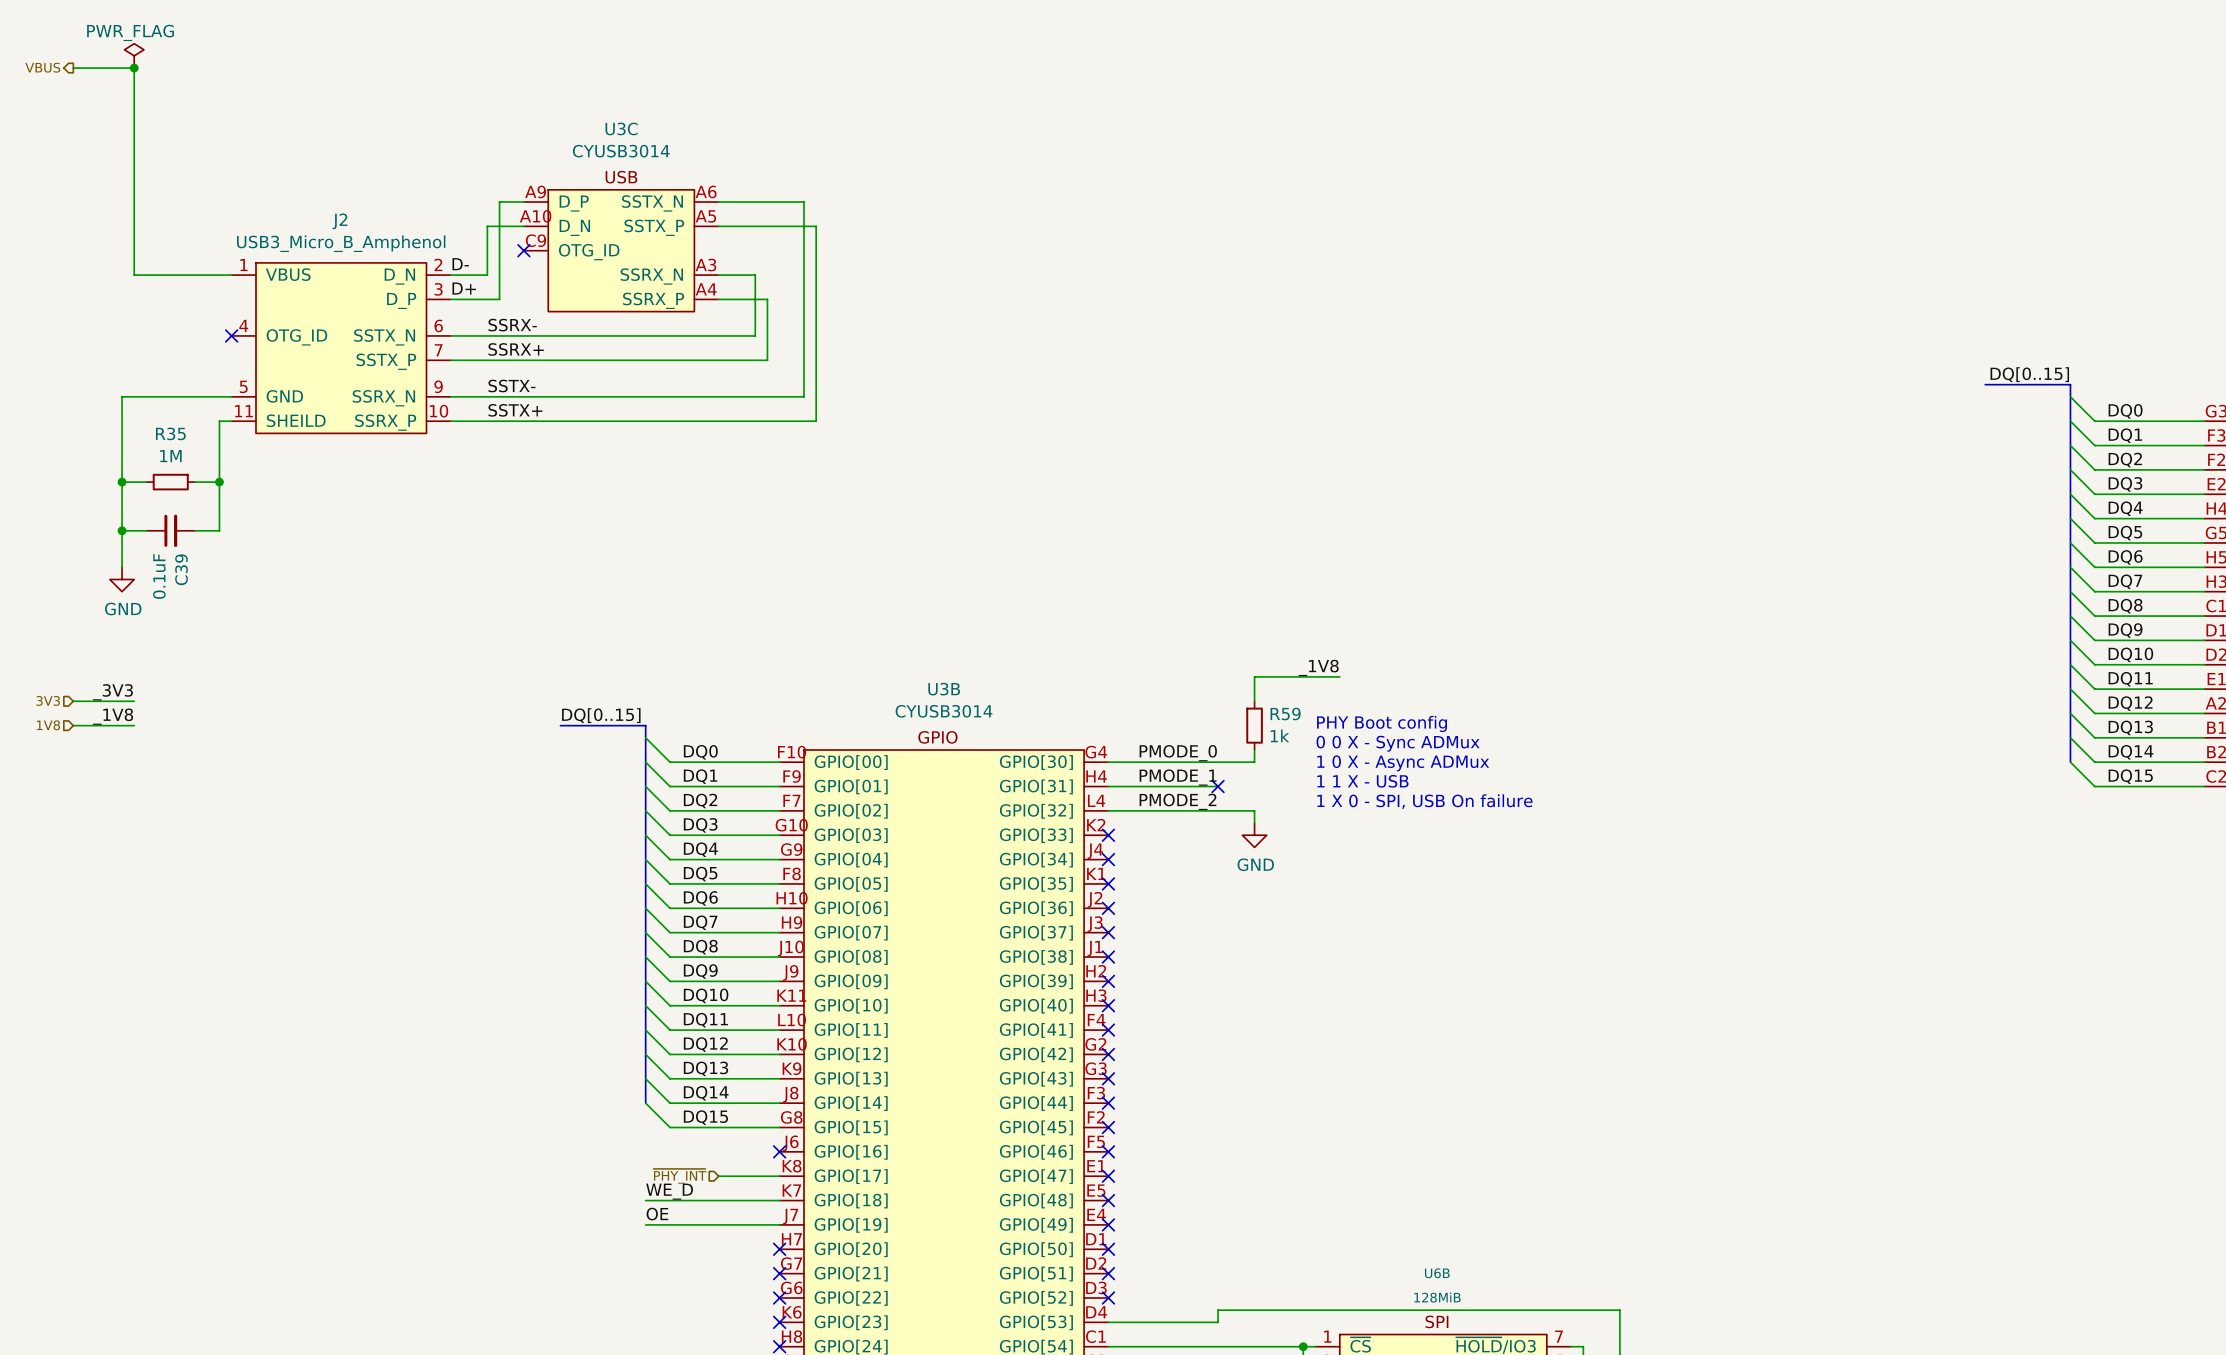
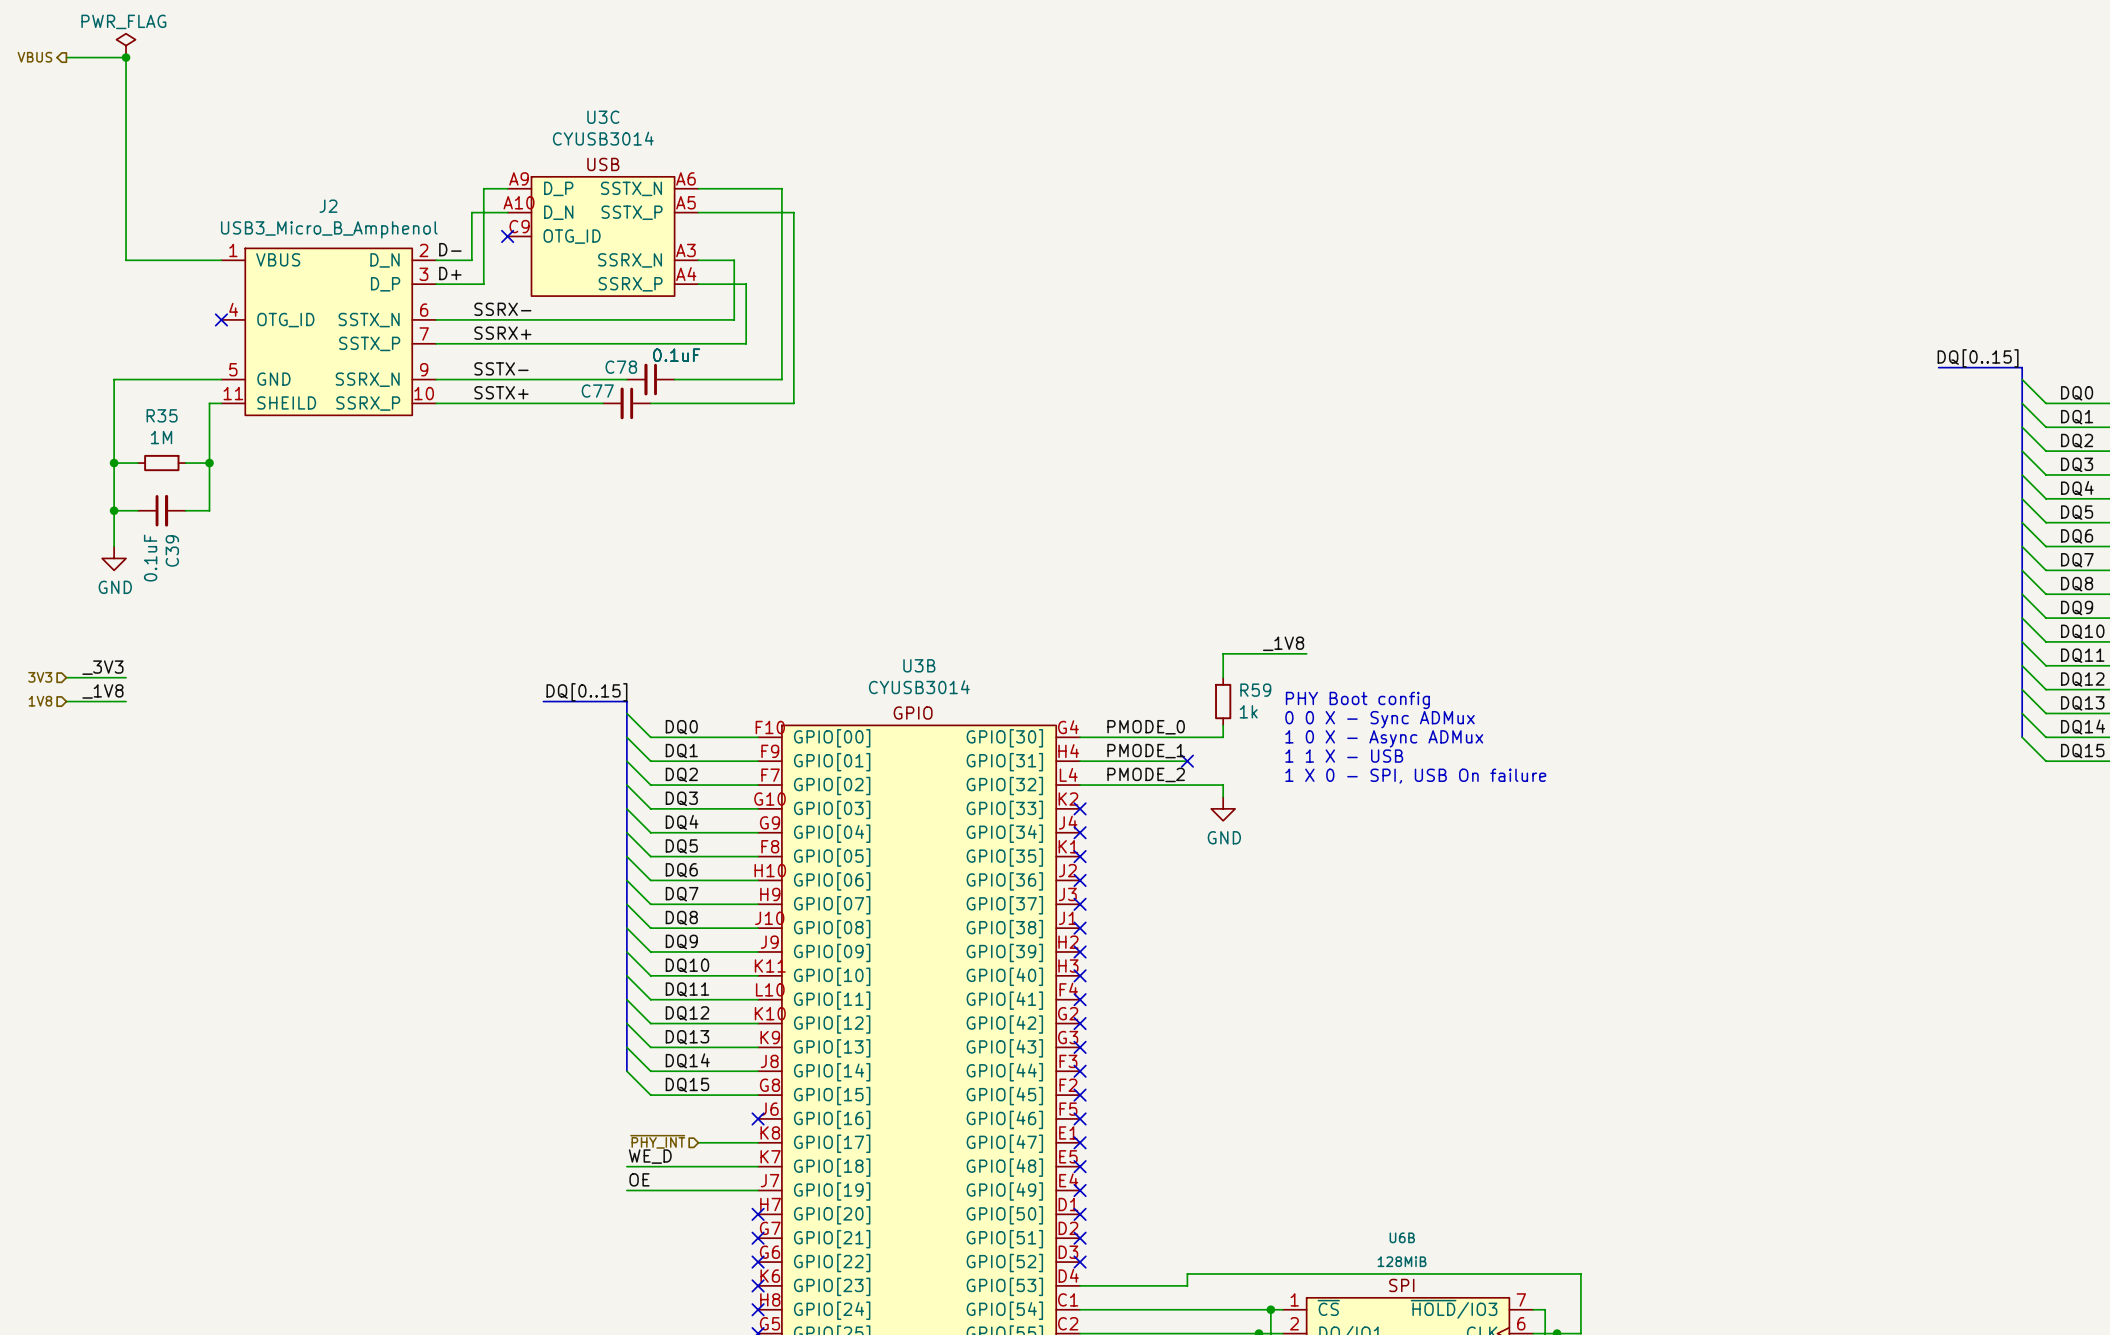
C78: none -> 0.1uF (650, 379)
C77: none -> 0.1uF (626, 403)

